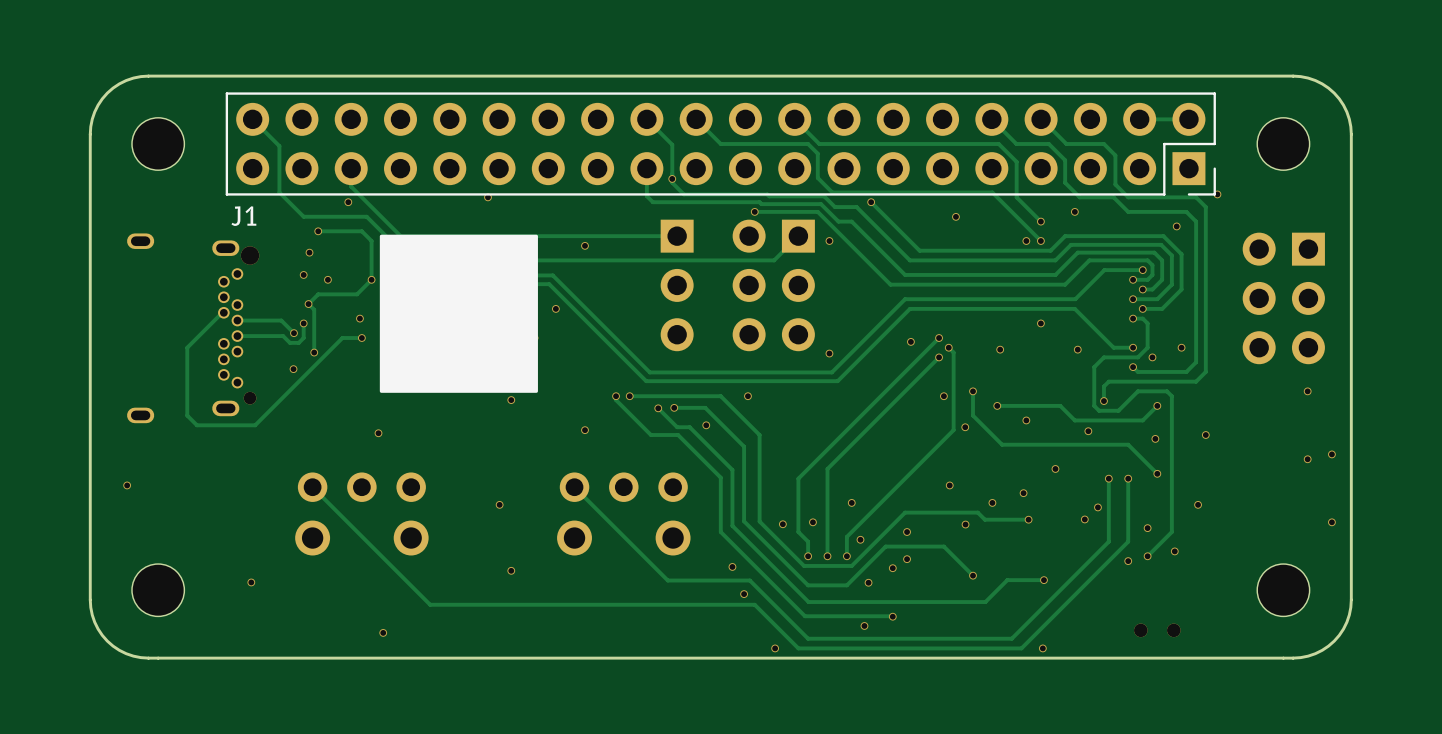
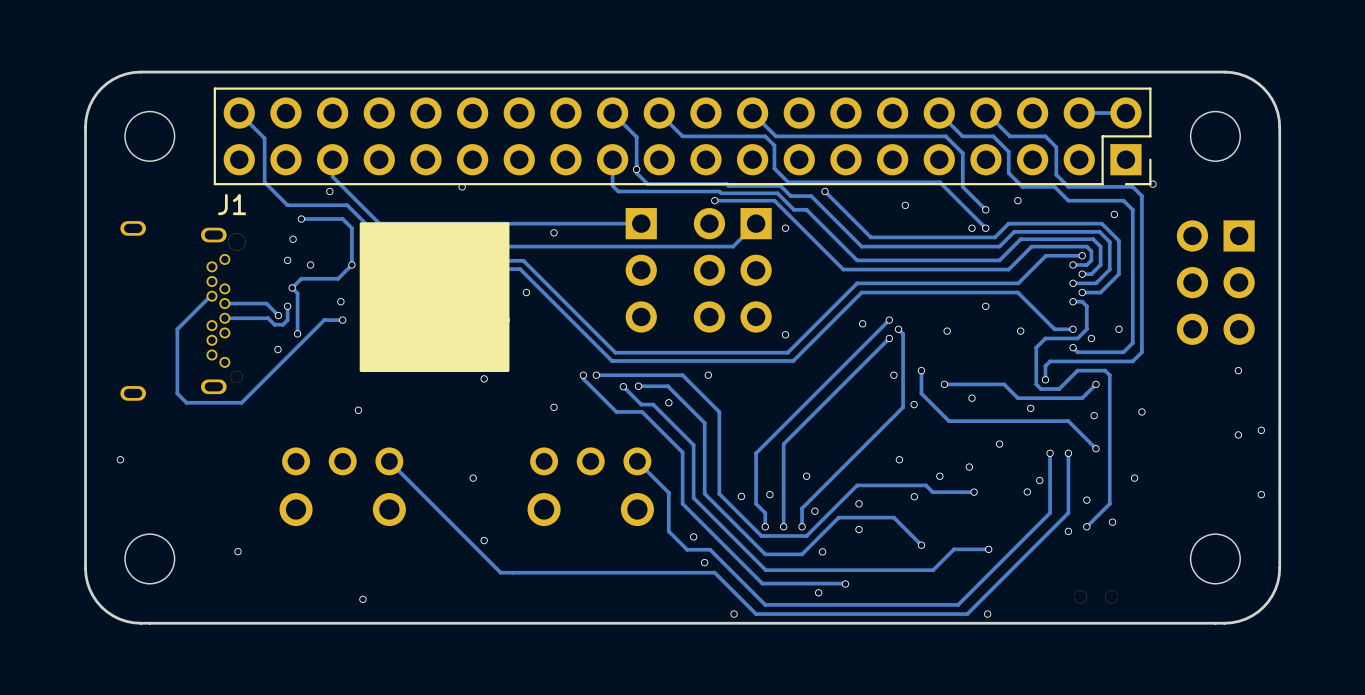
track: (312, 487) (430, 604) (528, 604) -> (389, 461) (500, 572)
track: (574, 487) (667, 580) (725, 580) -> (637, 461) (668, 492) (668, 531) (687, 549)
via: (892, 568) -> none

